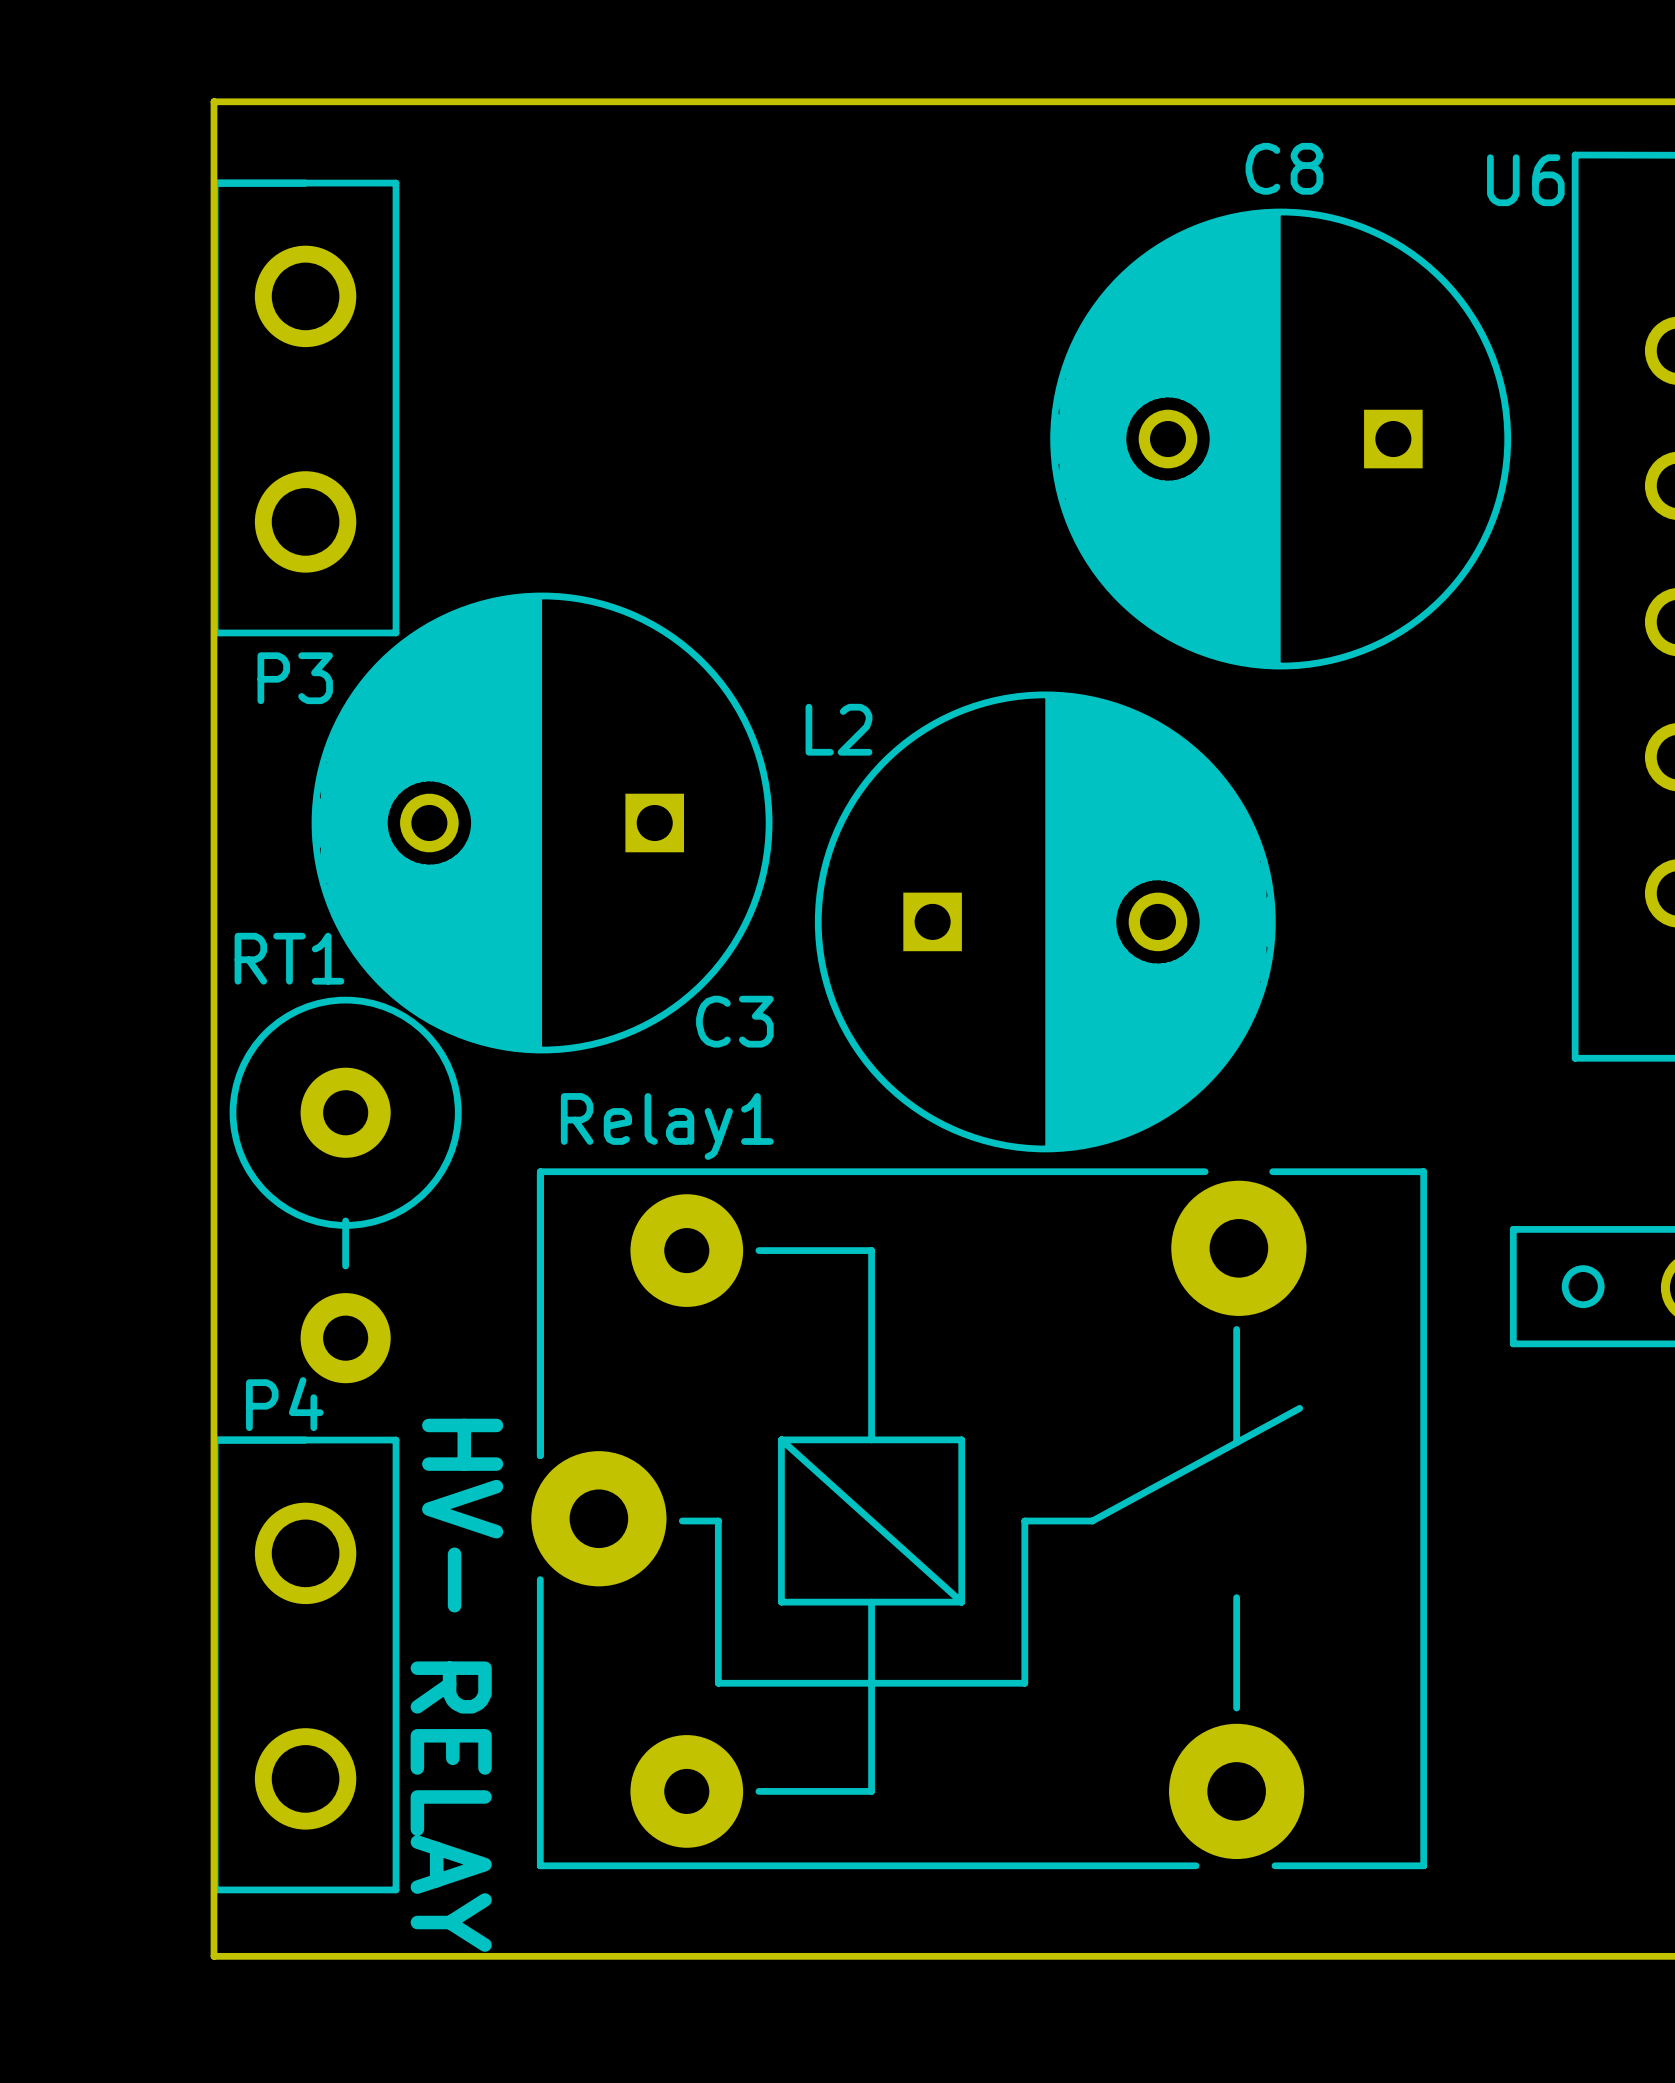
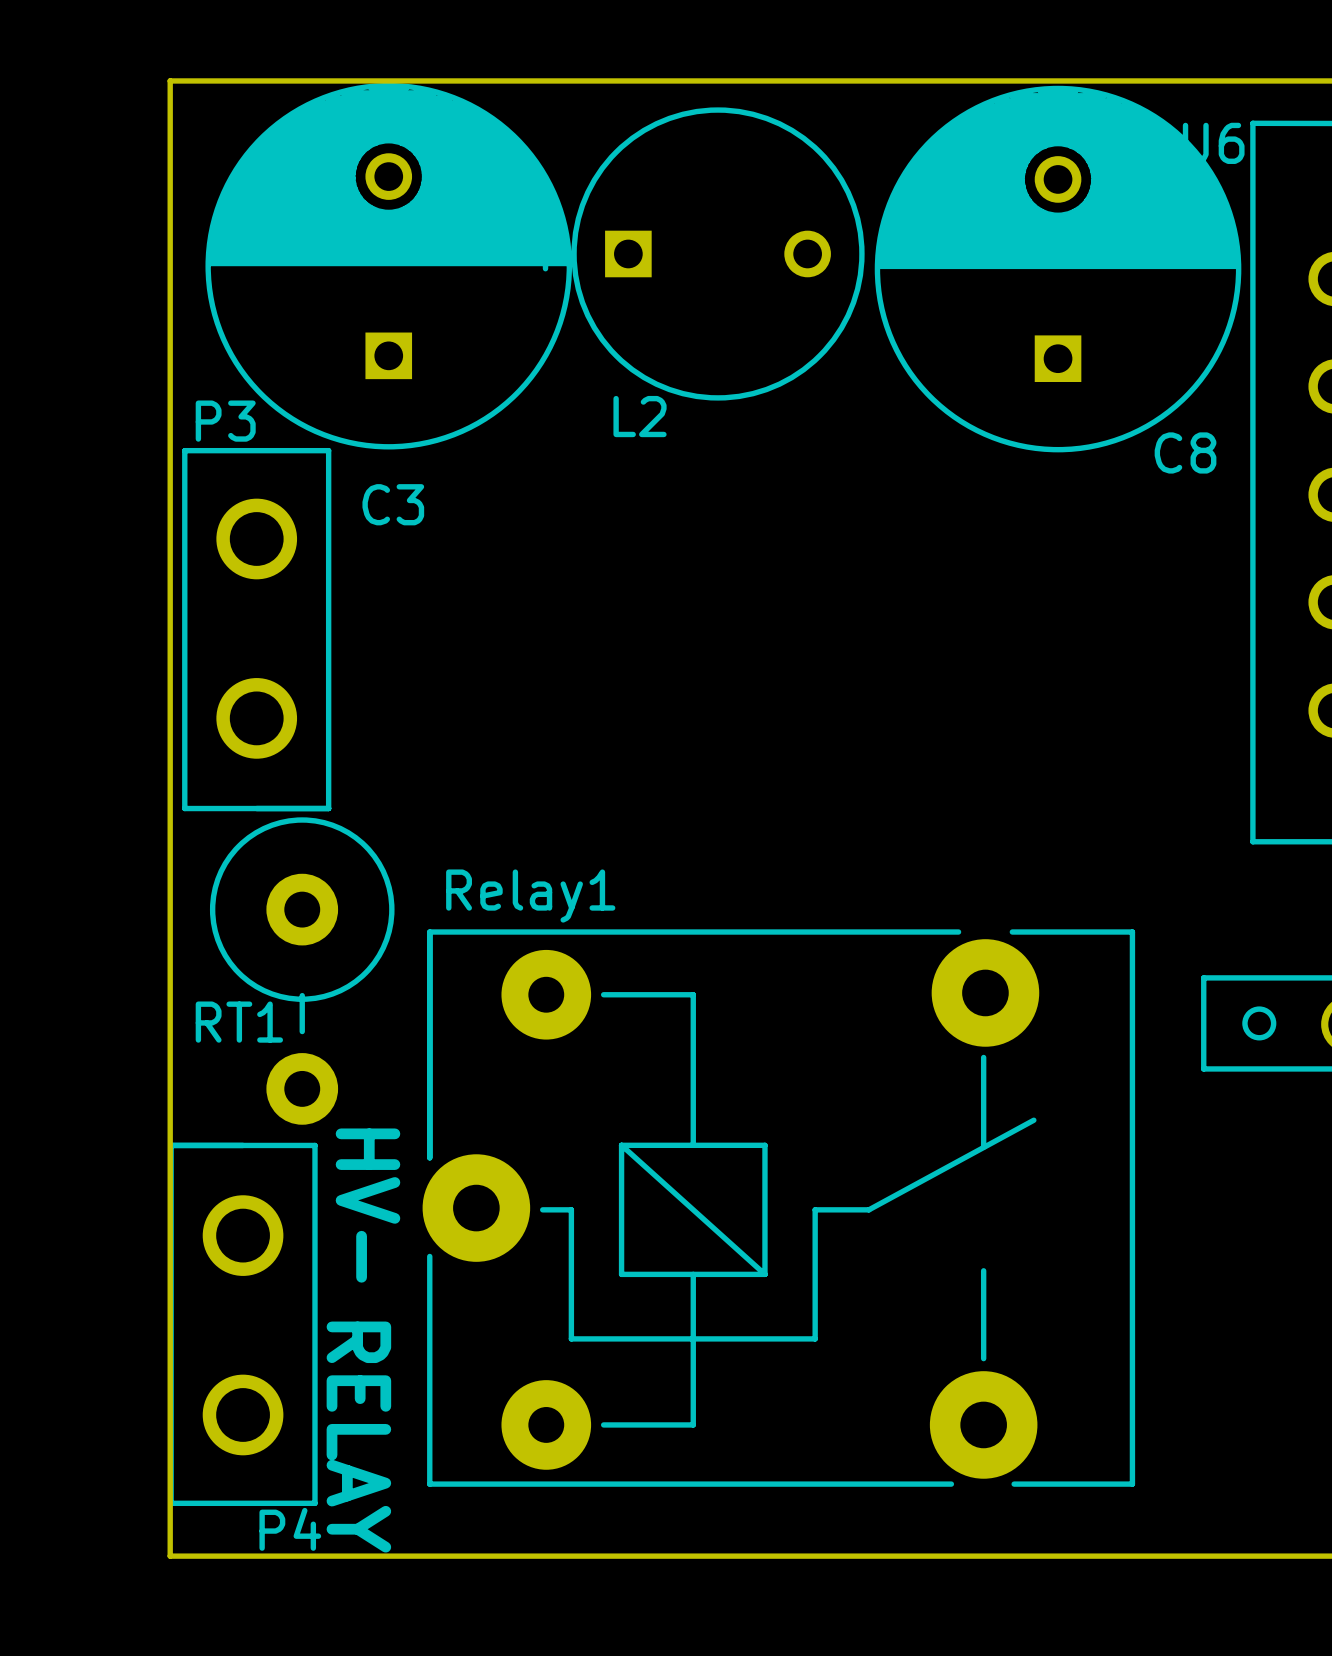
C8 name position: C8 (1284, 168) -> C8 (1185, 452)
P3 rotation: 0° (305, 408) -> 180° (256, 629)
P3 position: (305, 408) -> (256, 629)
C8 rotation: 0° (1280, 439) -> 90° clockwise (1058, 269)
L2 footprint: [814, 691, 1276, 1153] -> [571, 107, 865, 401]
L2 name position: L2 (838, 729) -> L2 (640, 416)
C3 rotation: 0° (542, 823) -> 90° clockwise (388, 266)
C3 position: (542, 823) -> (388, 266)
RT1 name position: RT1 (289, 958) -> RT1 (239, 1022)
C3 name position: C3 (734, 1021) -> C3 (393, 504)
RT1 position: (345, 1189) -> (302, 971)
P4 name position: P4 (284, 1404) -> P4 (290, 1529)

